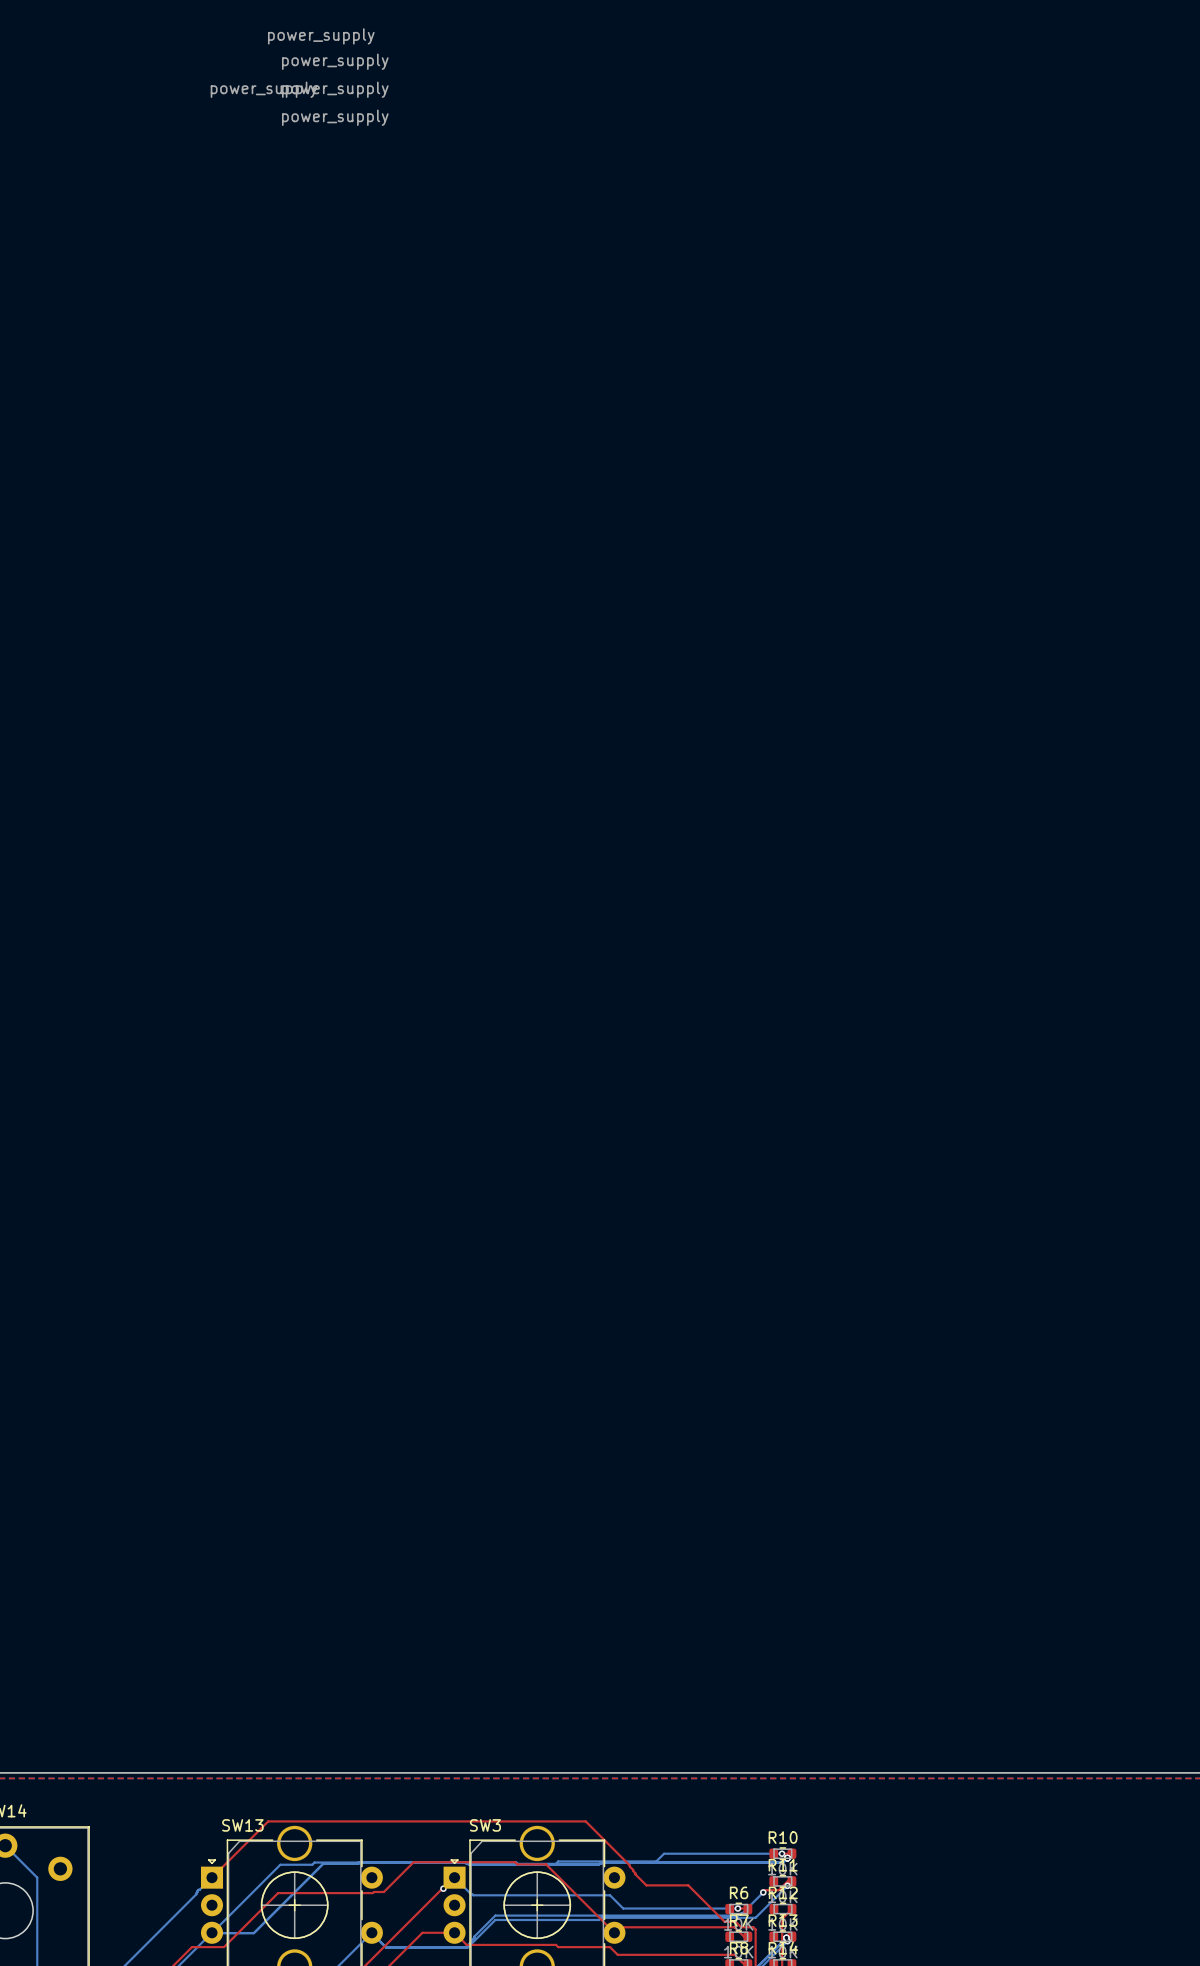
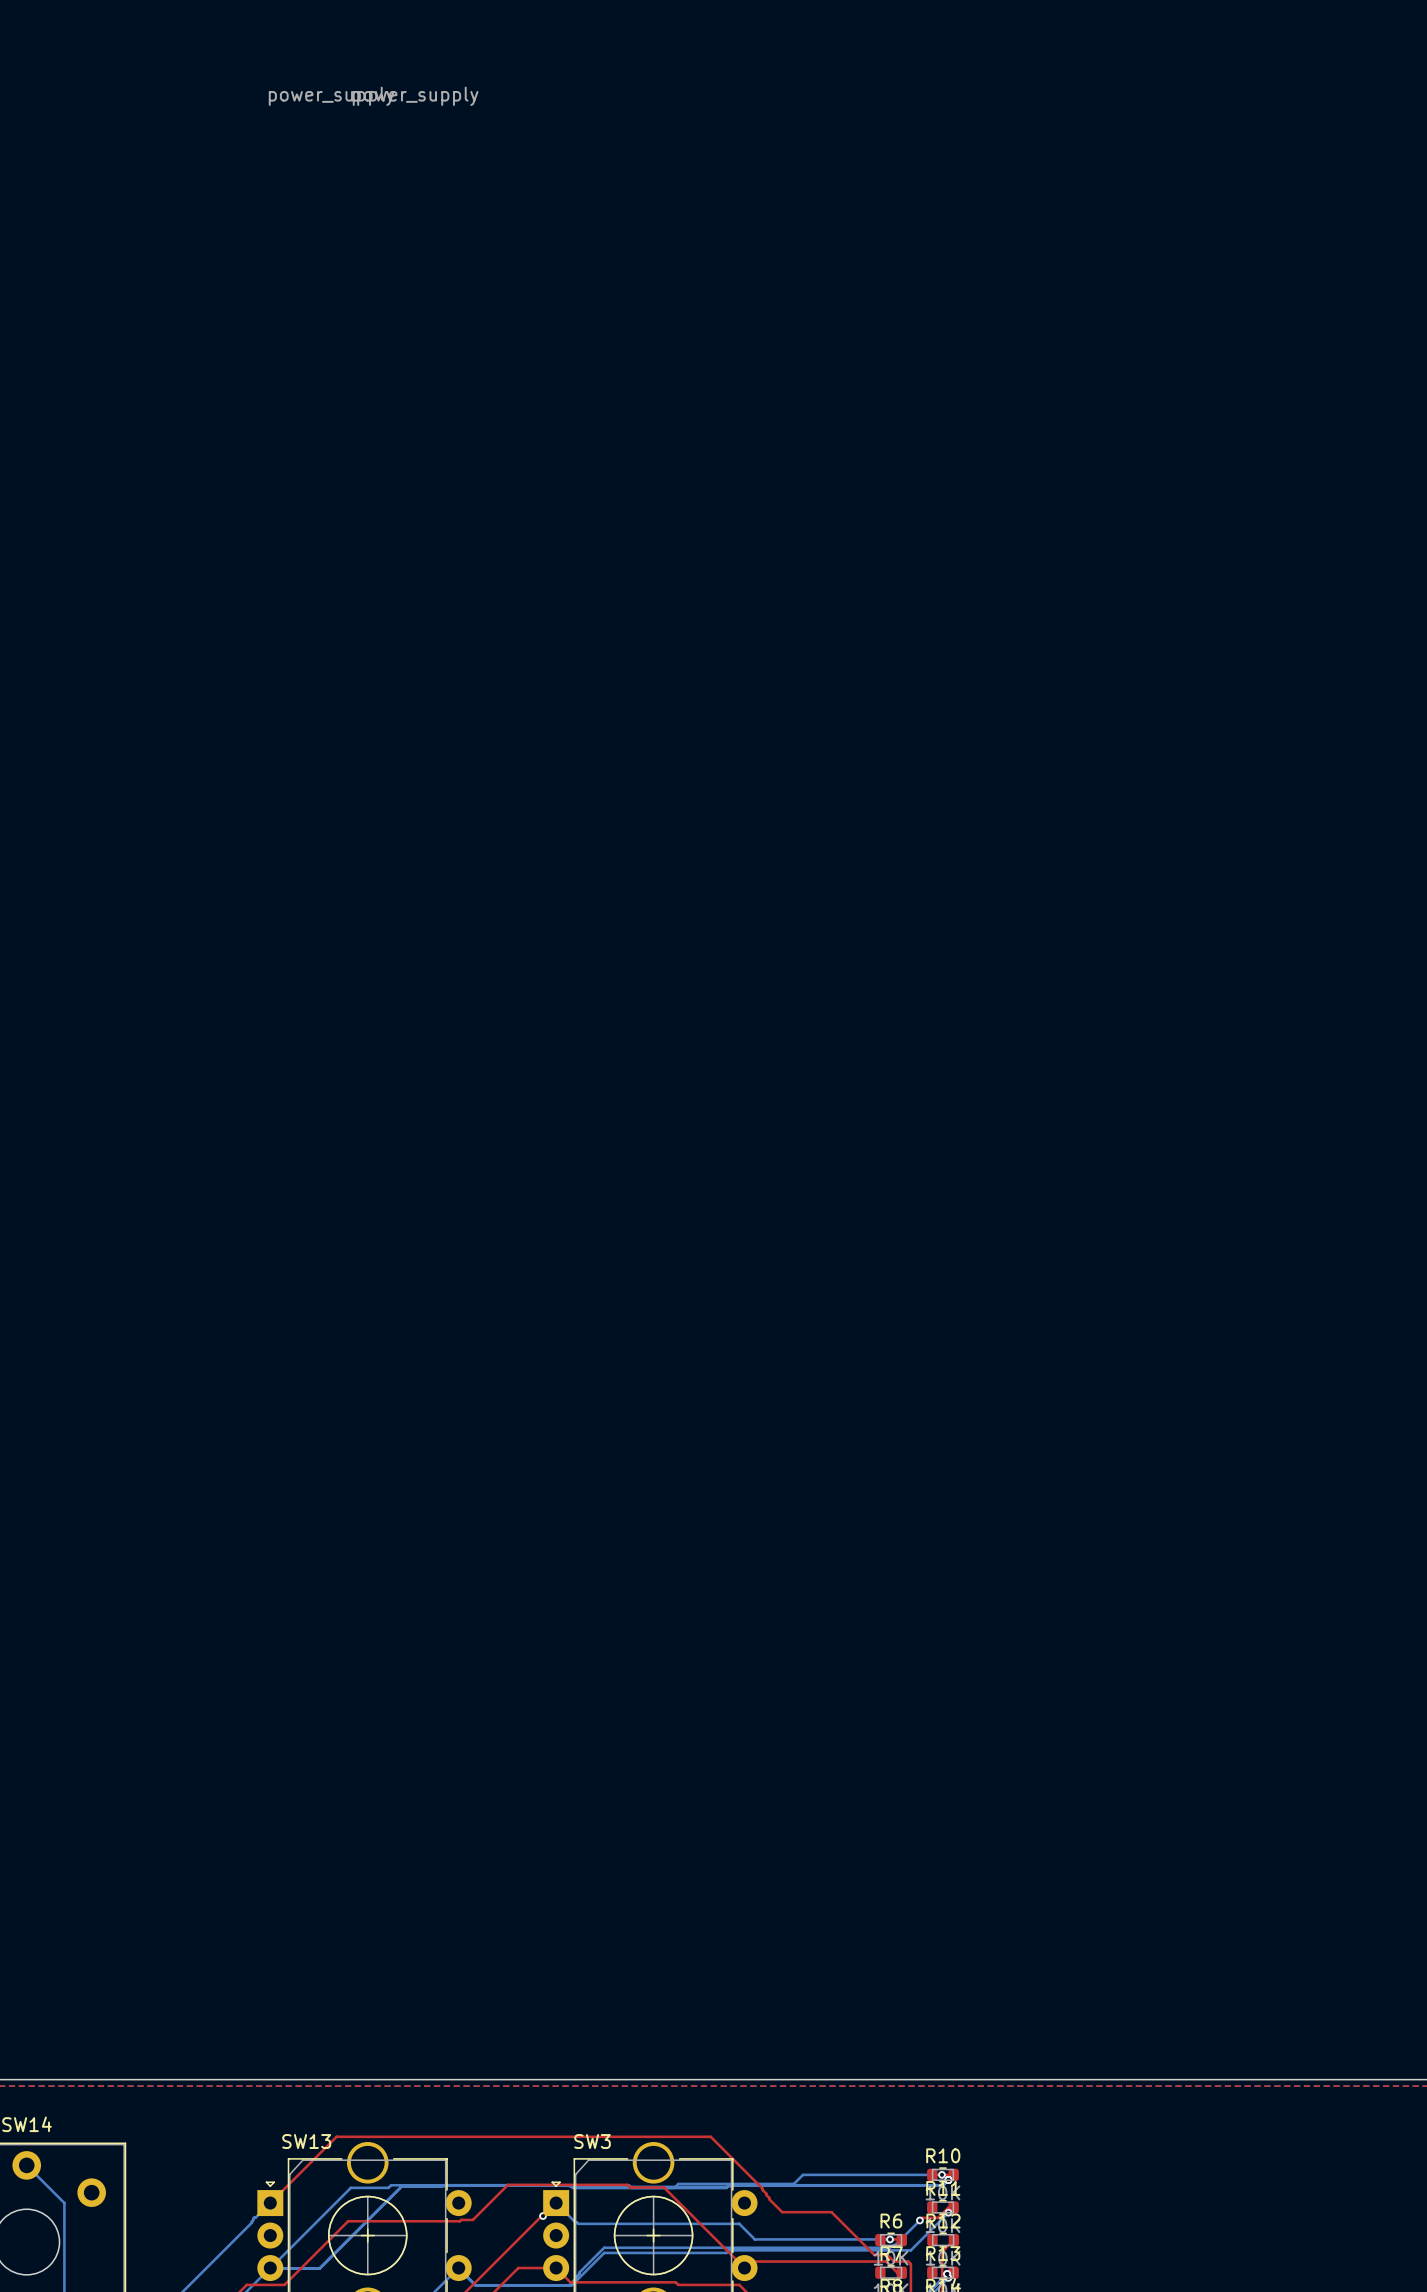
part text: power_supply (321, 36) -> none
part text: power_supply (335, 61) -> none
part text: power_supply (335, 117) -> none

